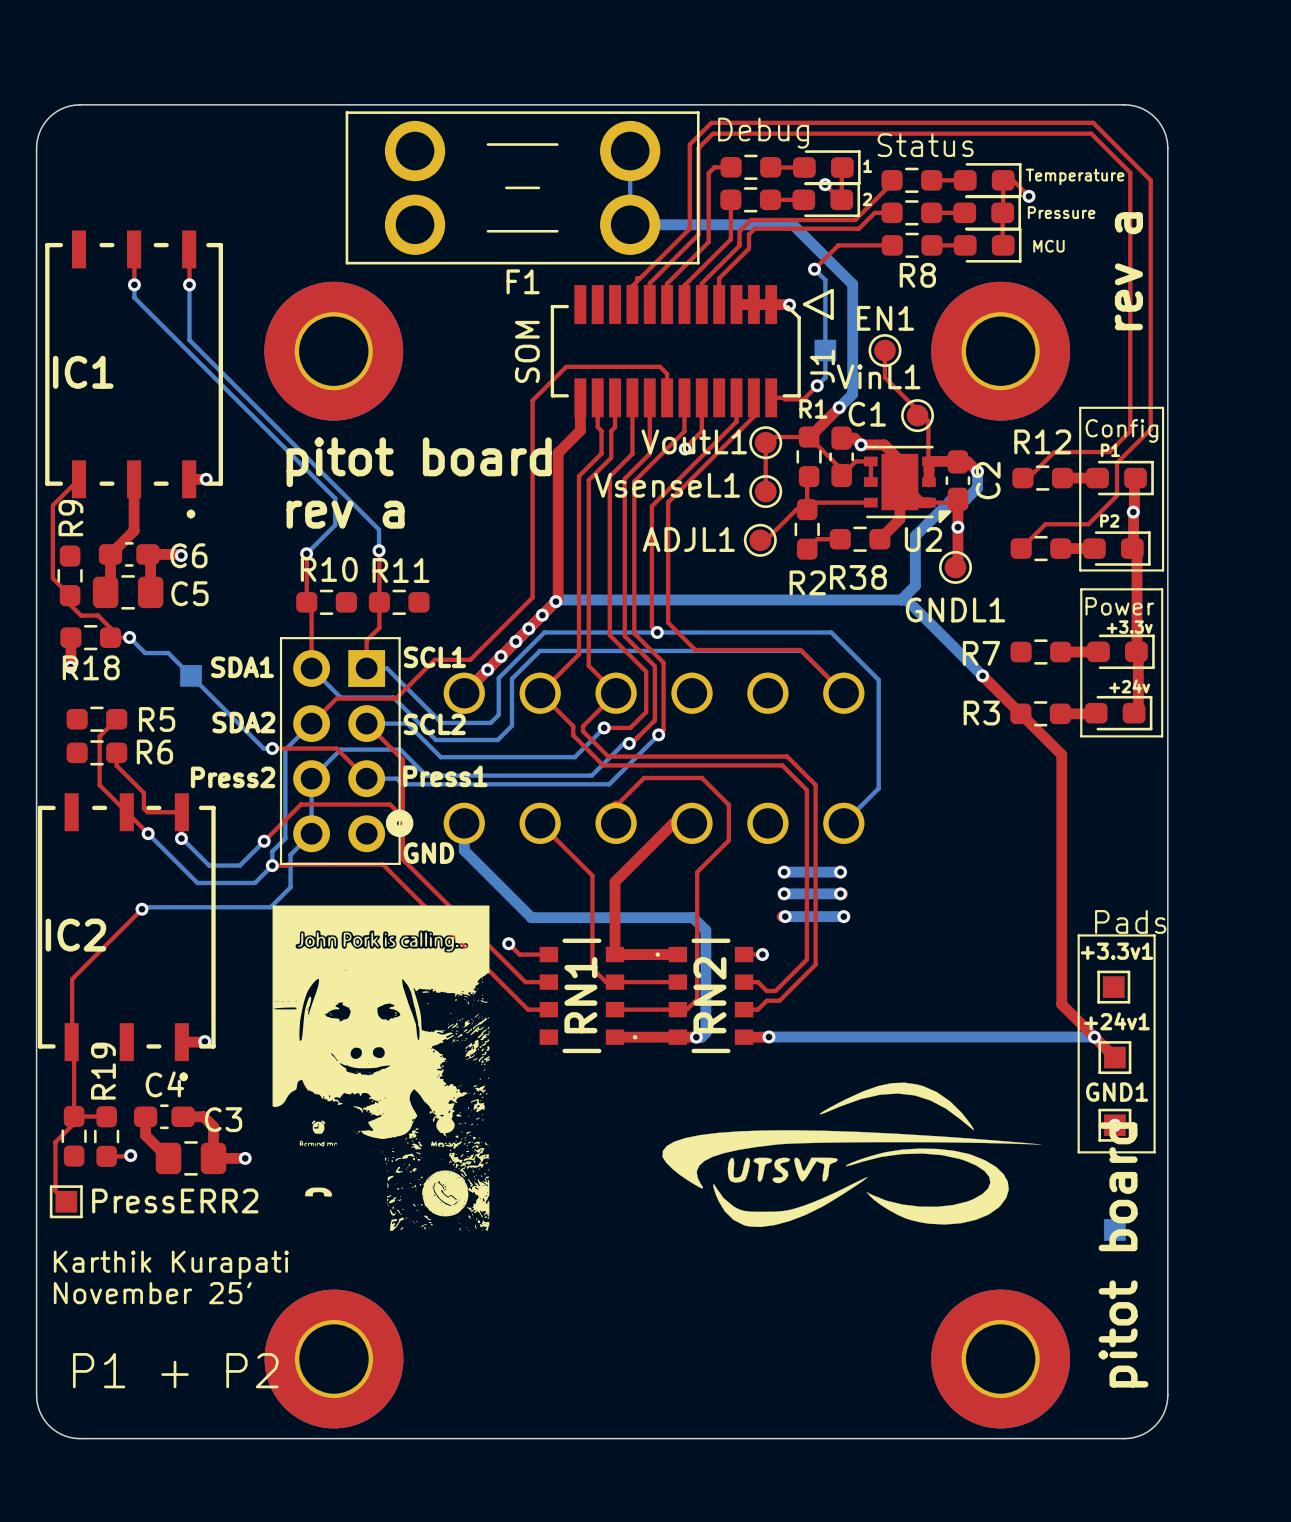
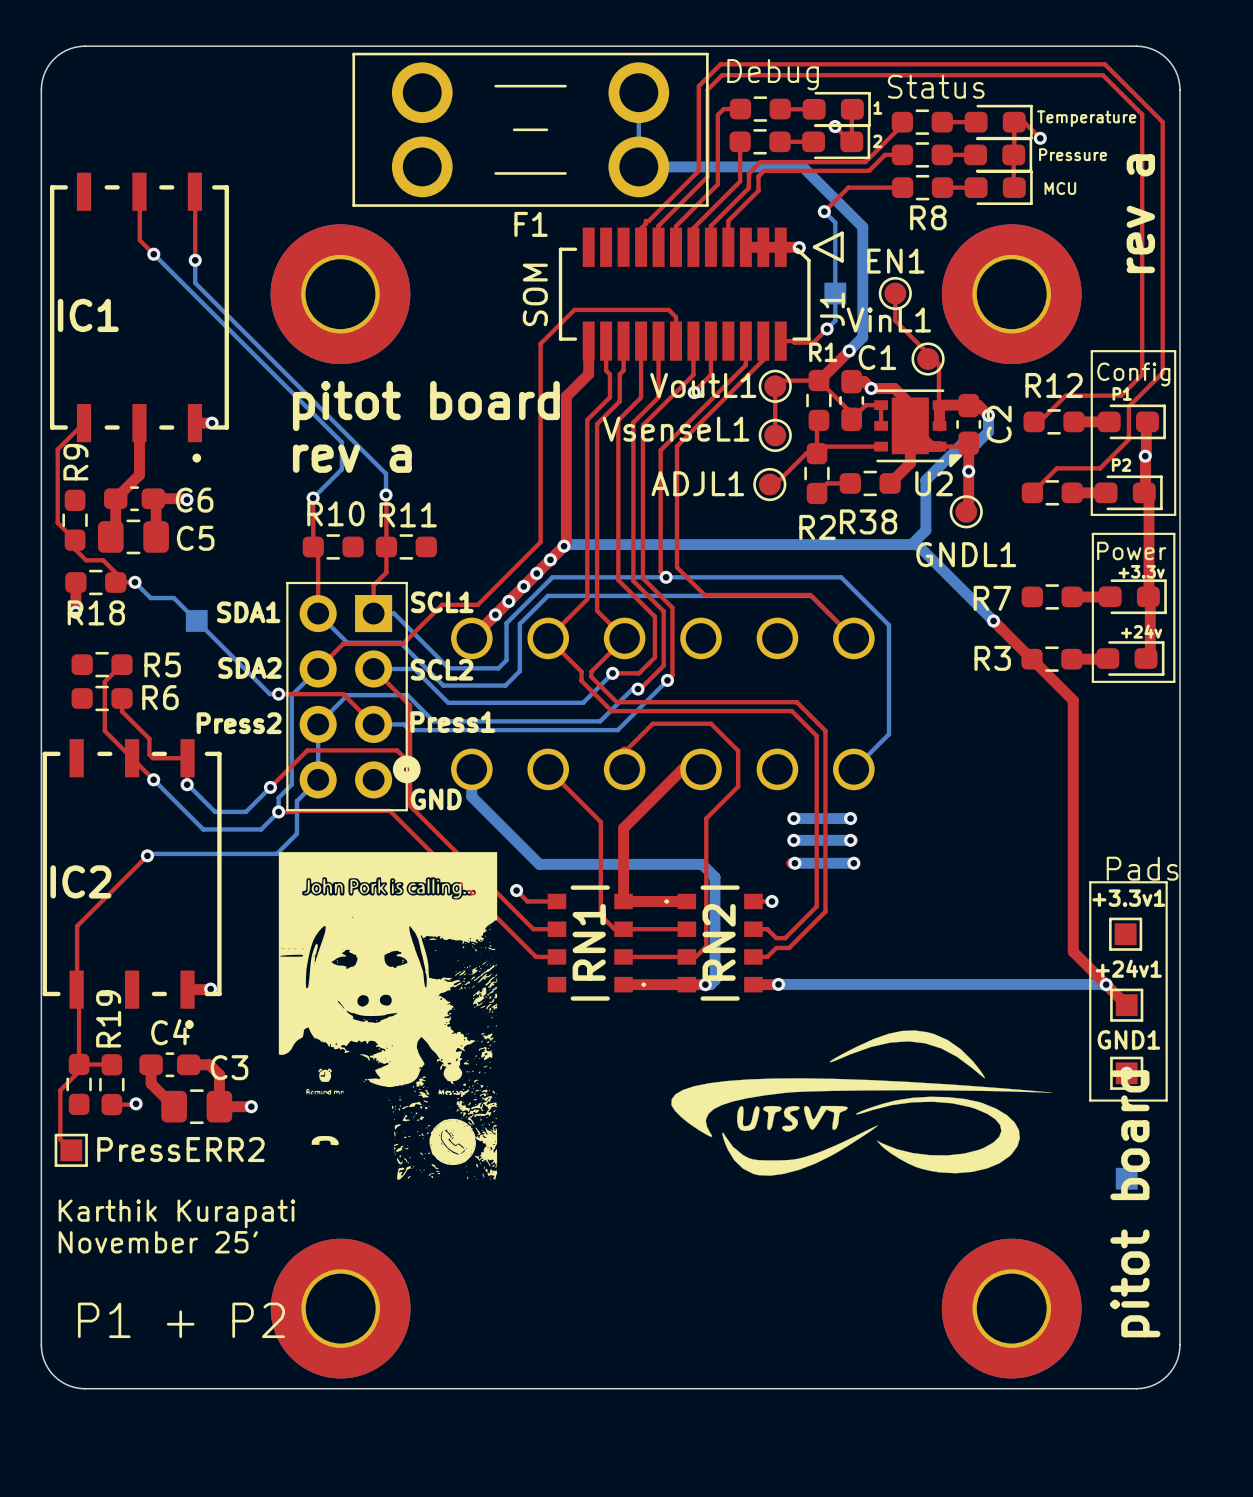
top track: none -> (139, 227) (139, 240) (153, 254)
bottom track: (134, 284) (134, 297) (148, 311) -> none
via: (134, 284) -> none
top track: none -> (195, 227) (195, 260)
bottom track: (189, 284) (189, 317) -> none
via: (189, 284) -> none
via: none -> (153, 254)
via: none -> (195, 260)

